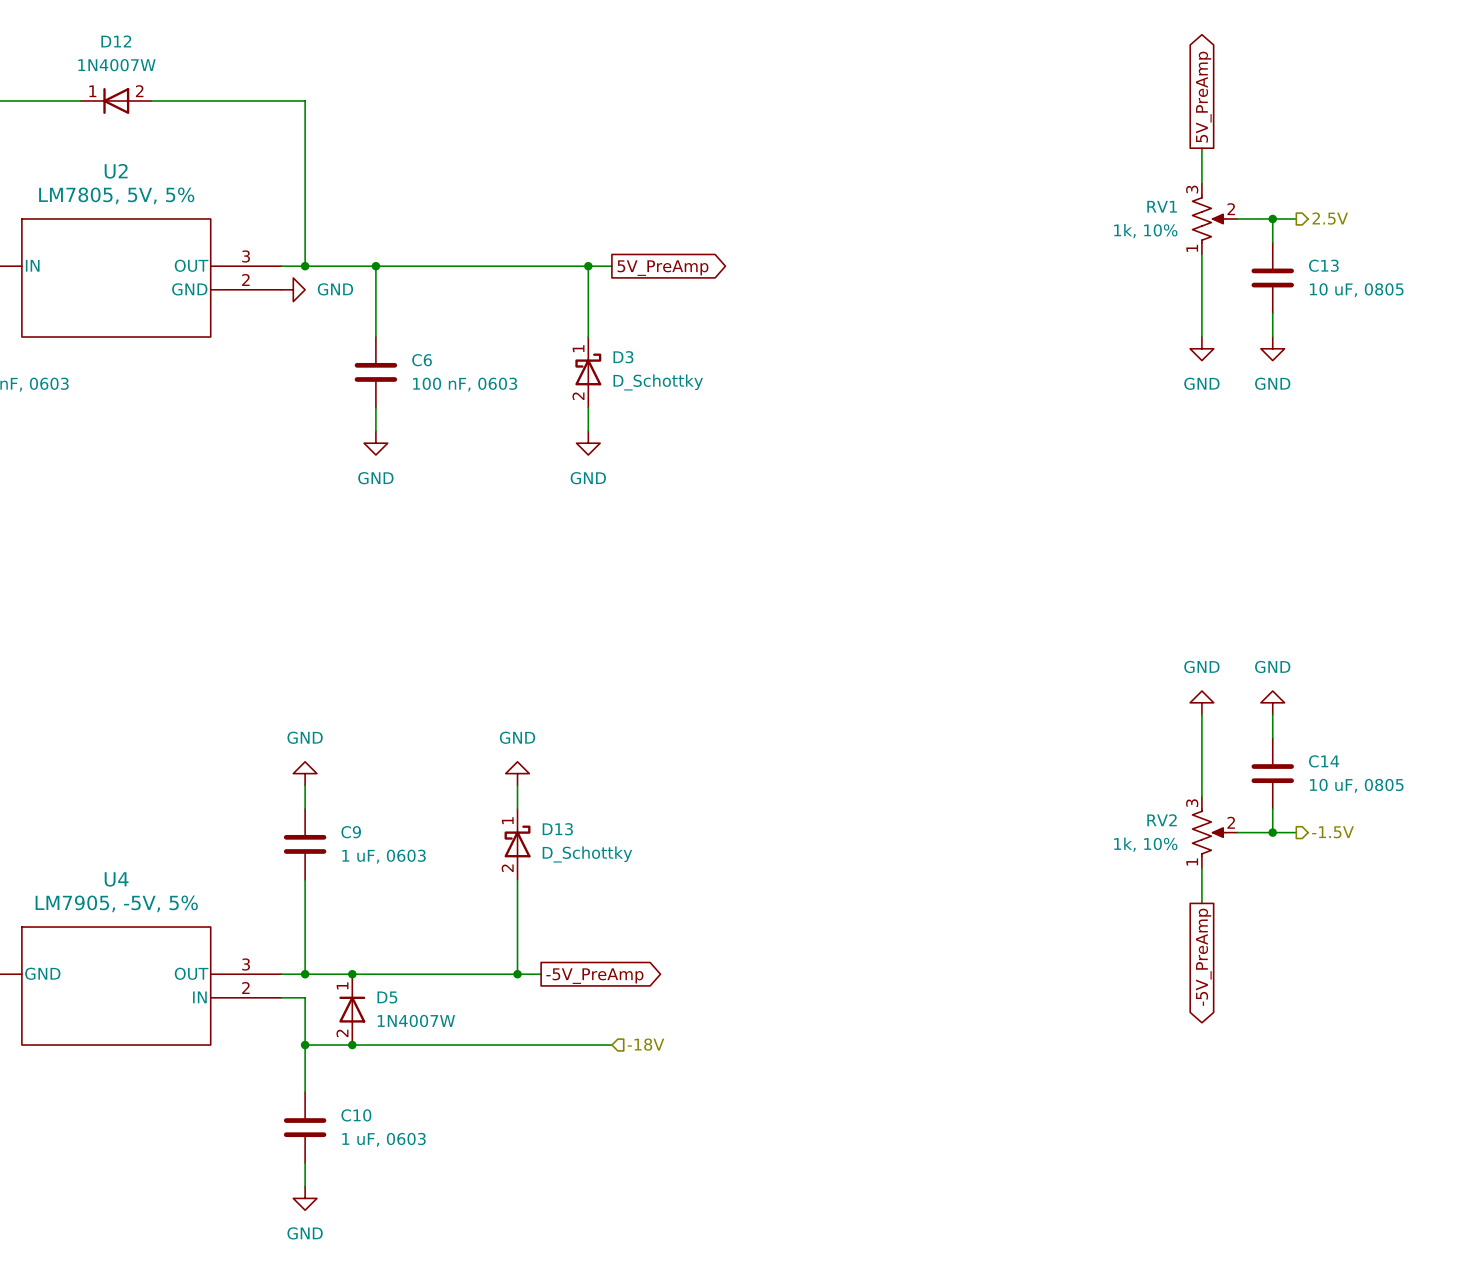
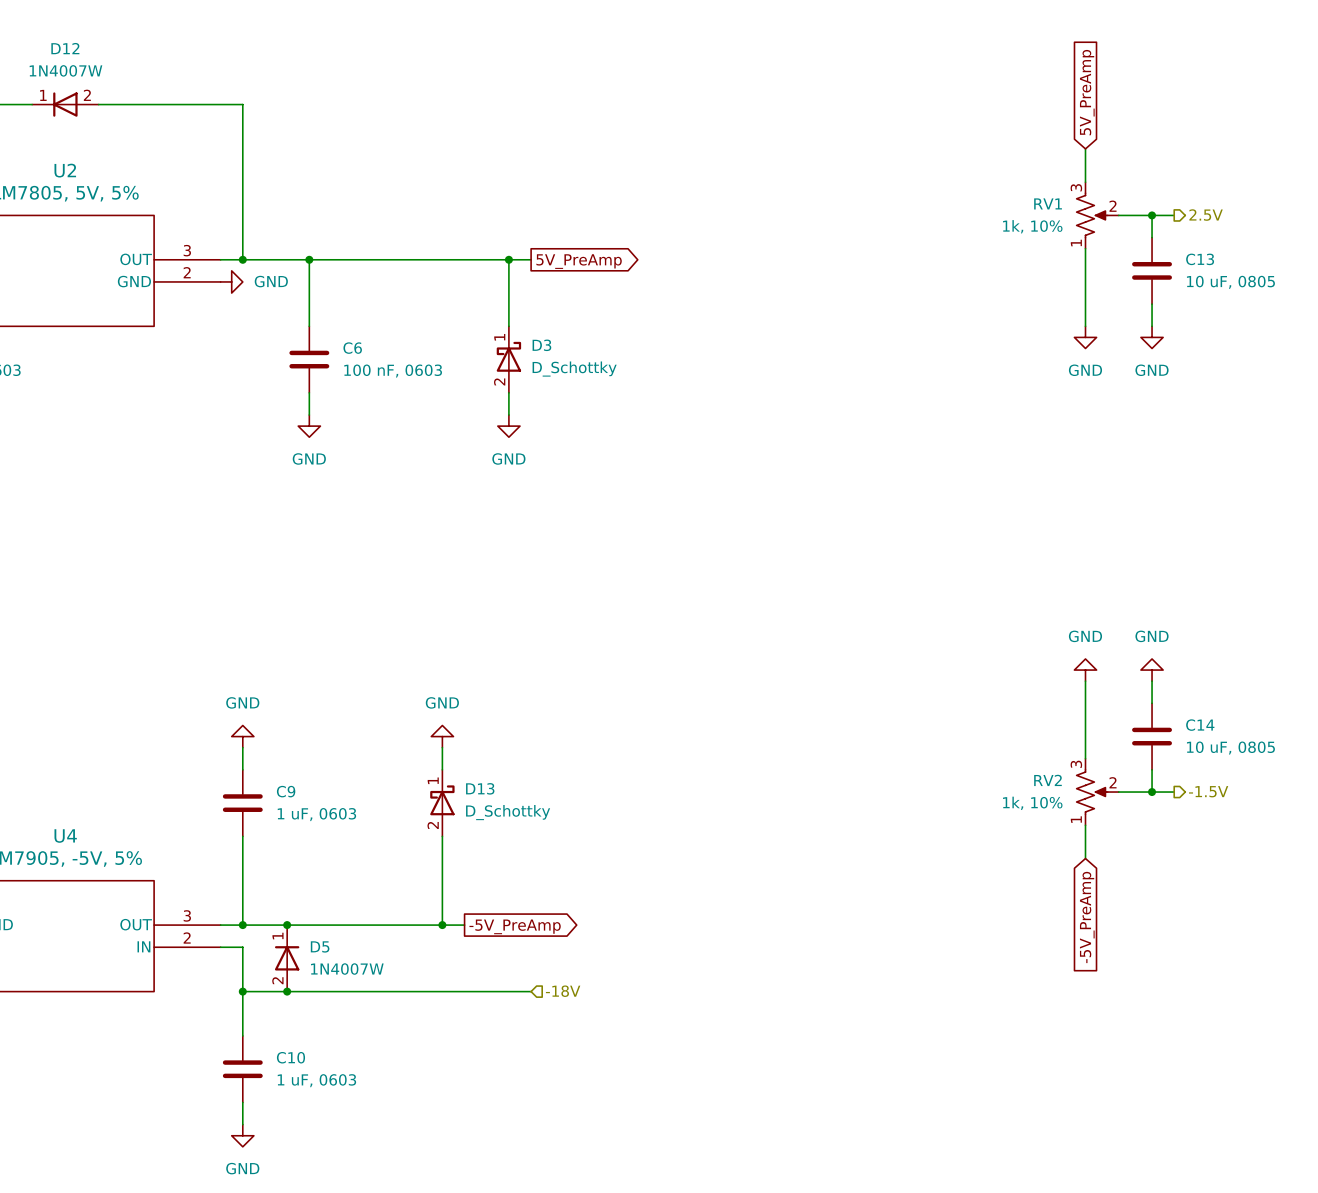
global label shape: output (1203, 97) -> input (1087, 92)
global label shape: output (1203, 957) -> input (1087, 917)

